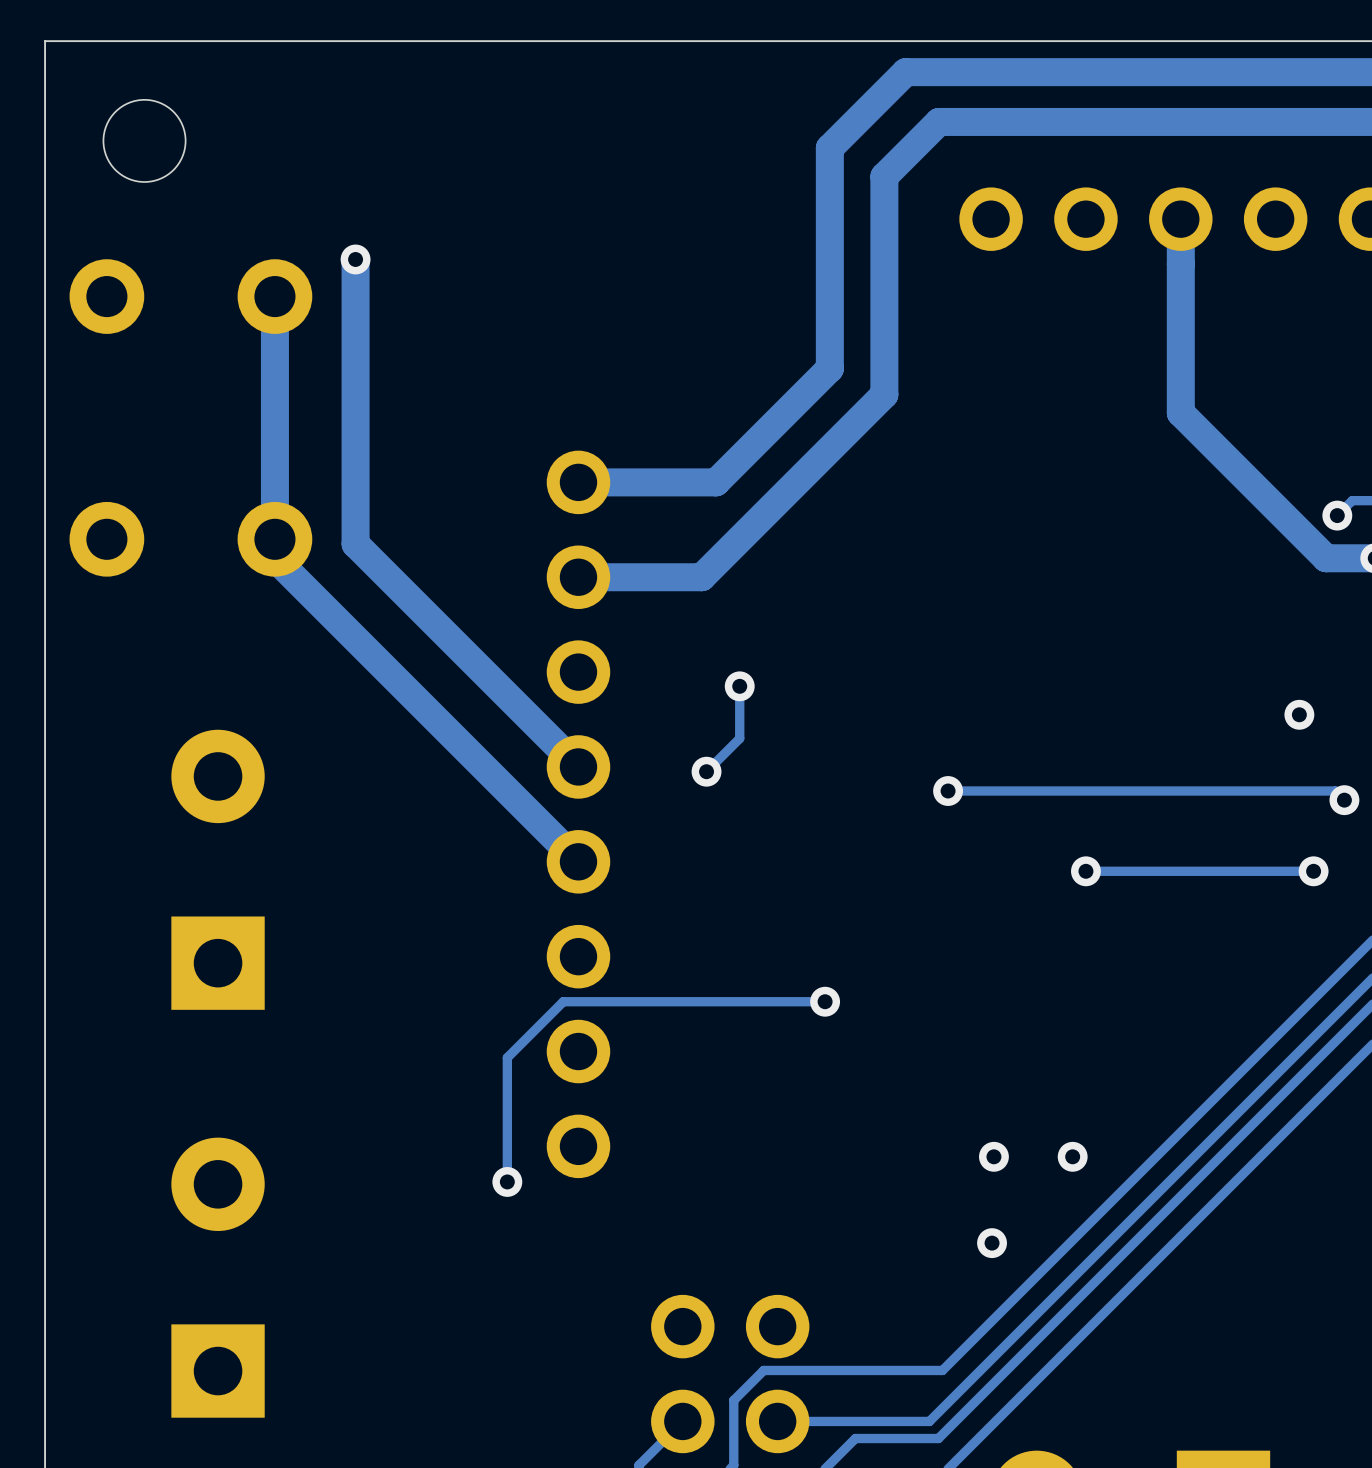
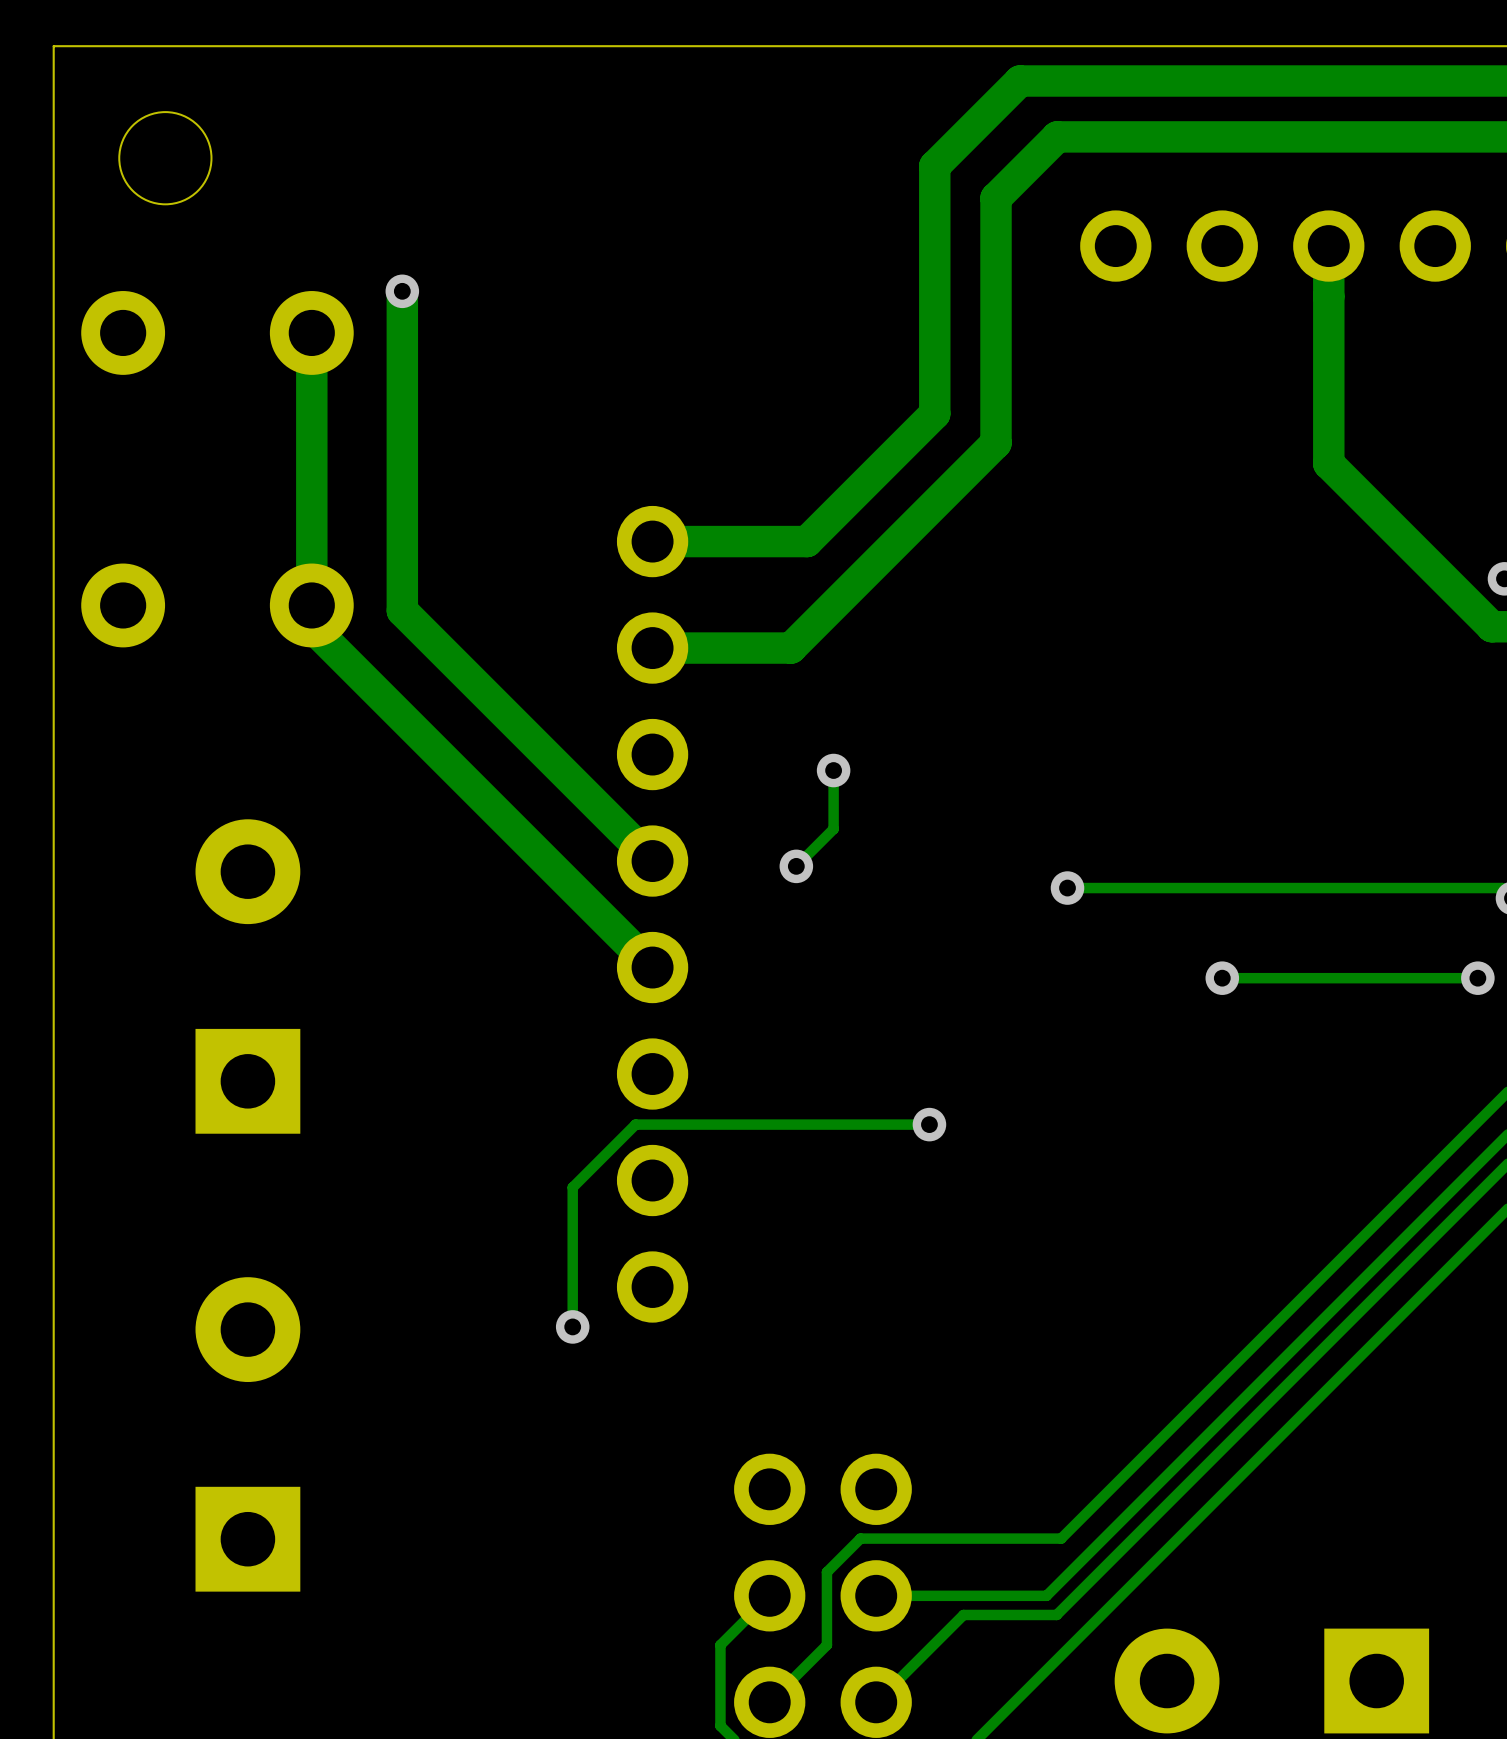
via: (1299, 714) -> none
via: (993, 1156) -> none
via: (1072, 1156) -> none
via: (992, 1243) -> none

